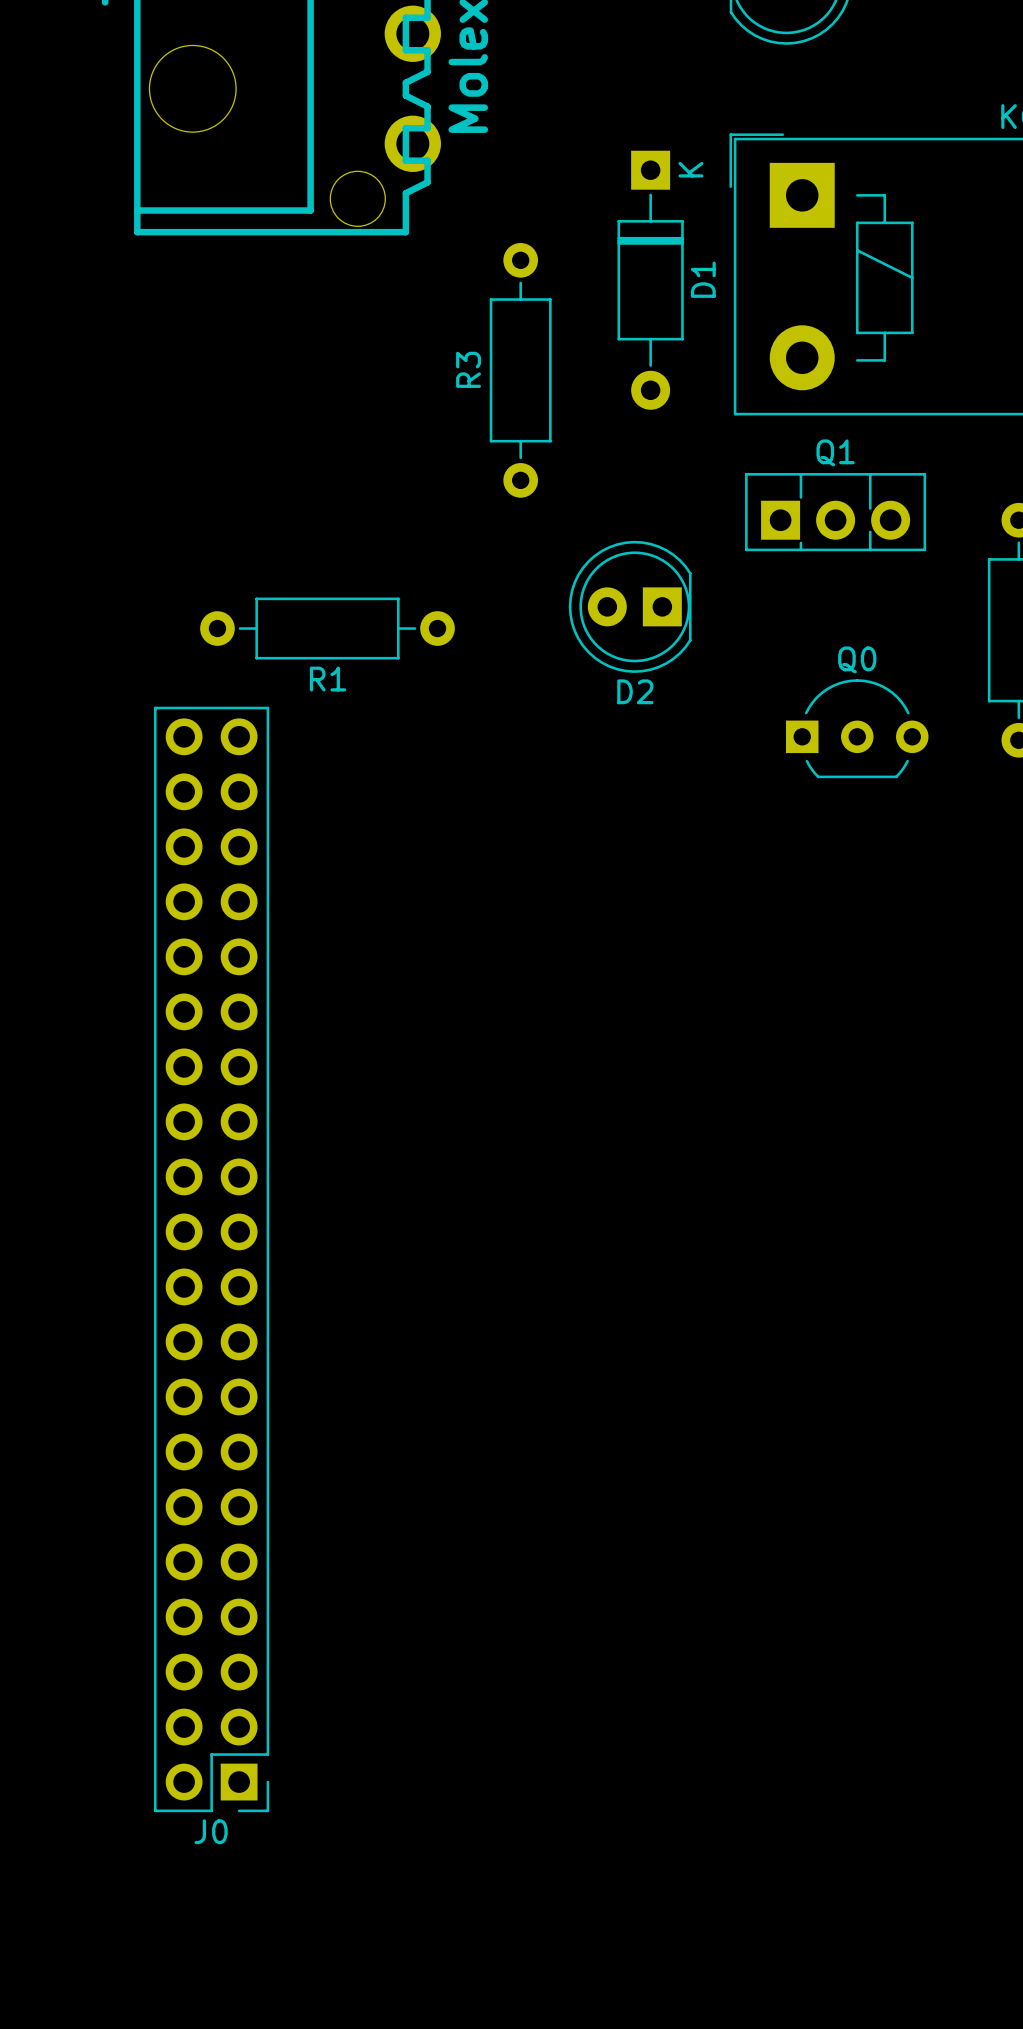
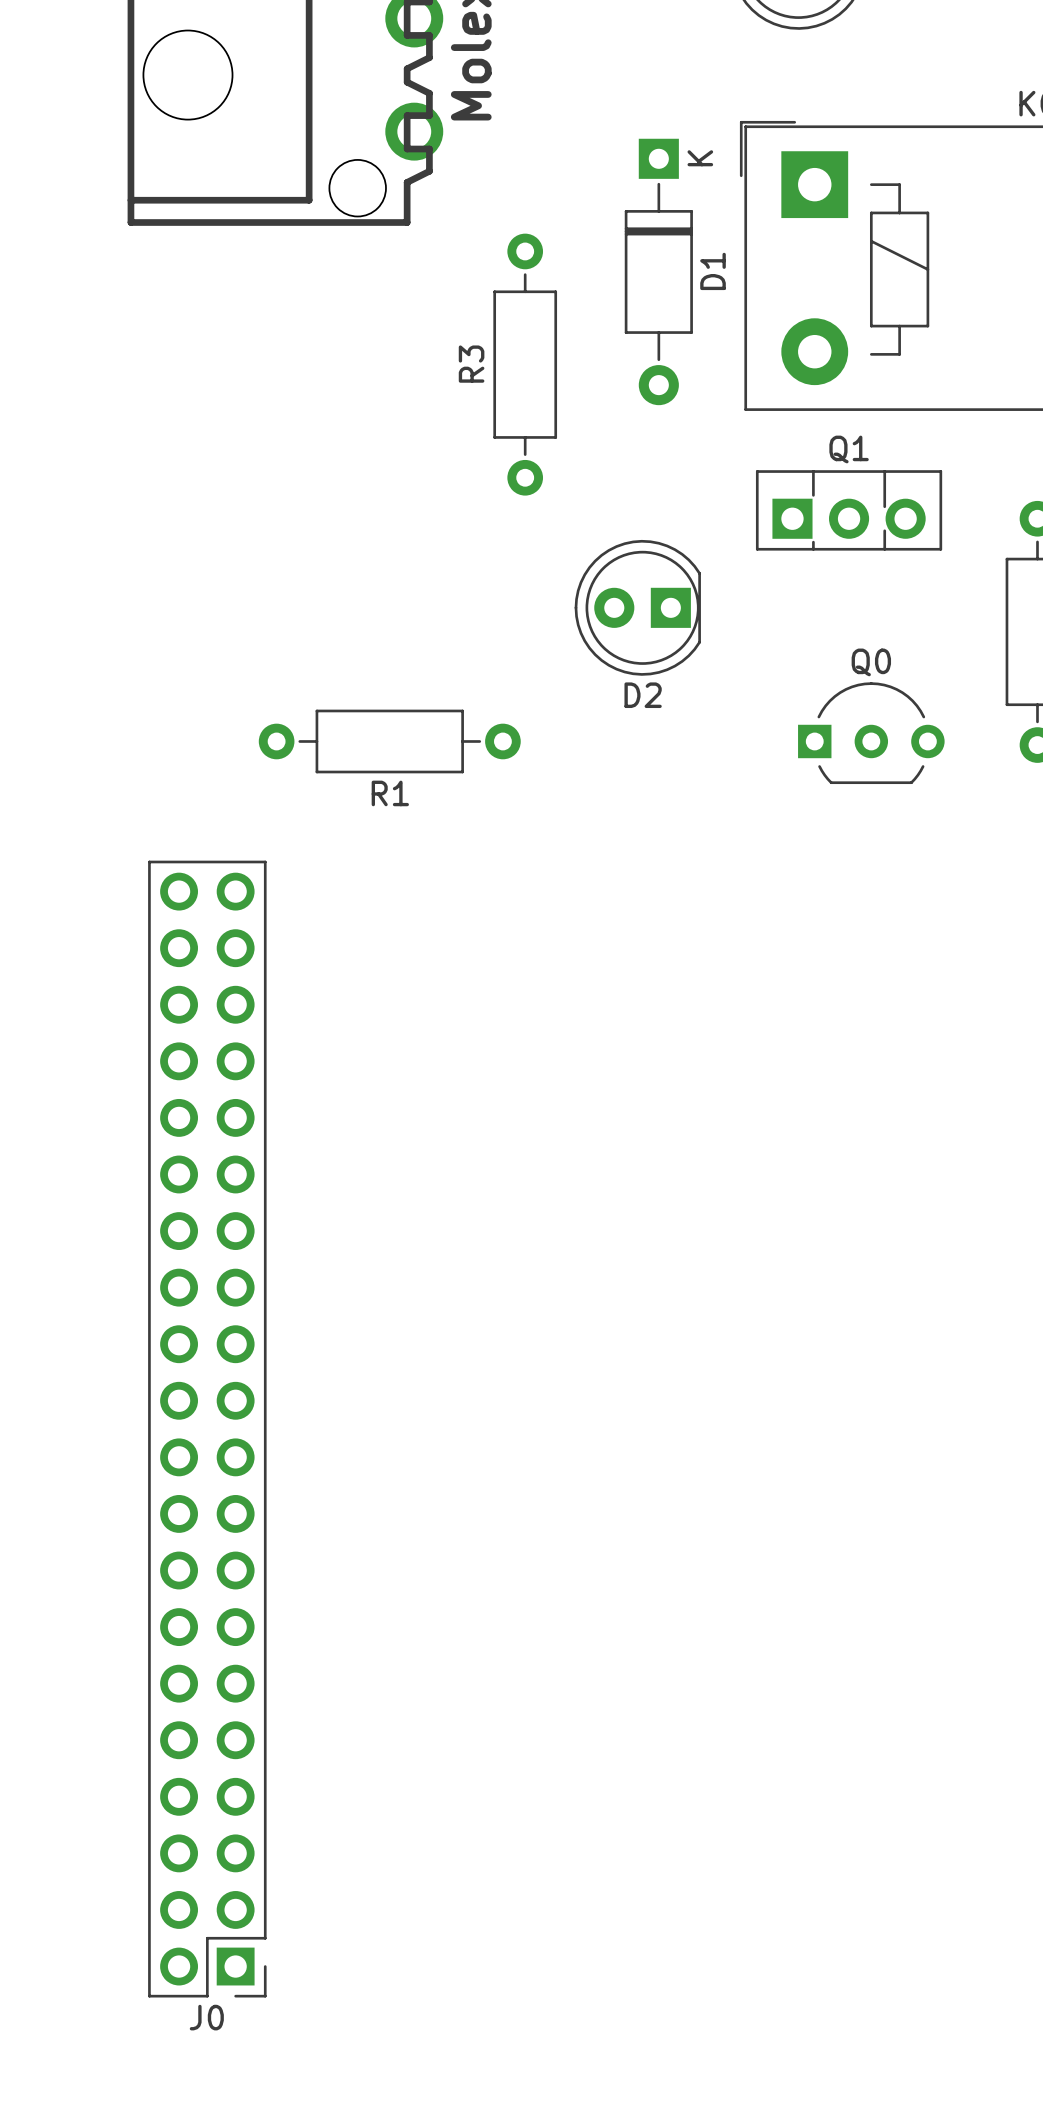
R1 position: (327, 628) -> (389, 741)
J0 position: (211, 1259) -> (207, 1429)

